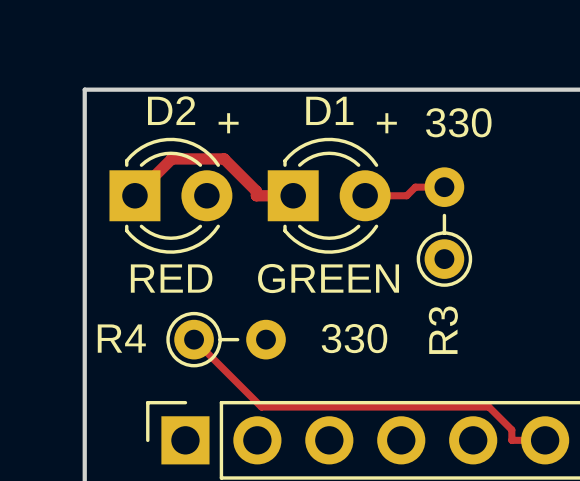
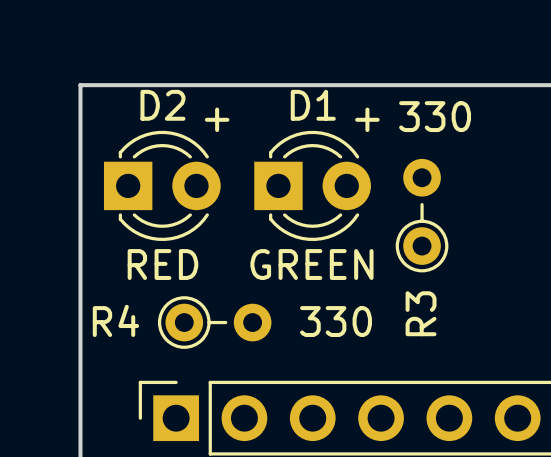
track: (444, 187) (415, 187) (406, 195) (365, 195) -> none
track: (134, 195) (171, 158) (224, 158) (256, 191) (256, 195) (293, 195) -> none
track: (194, 339) (261, 407) (488, 407) (511, 429) (511, 440) (545, 440) -> none

